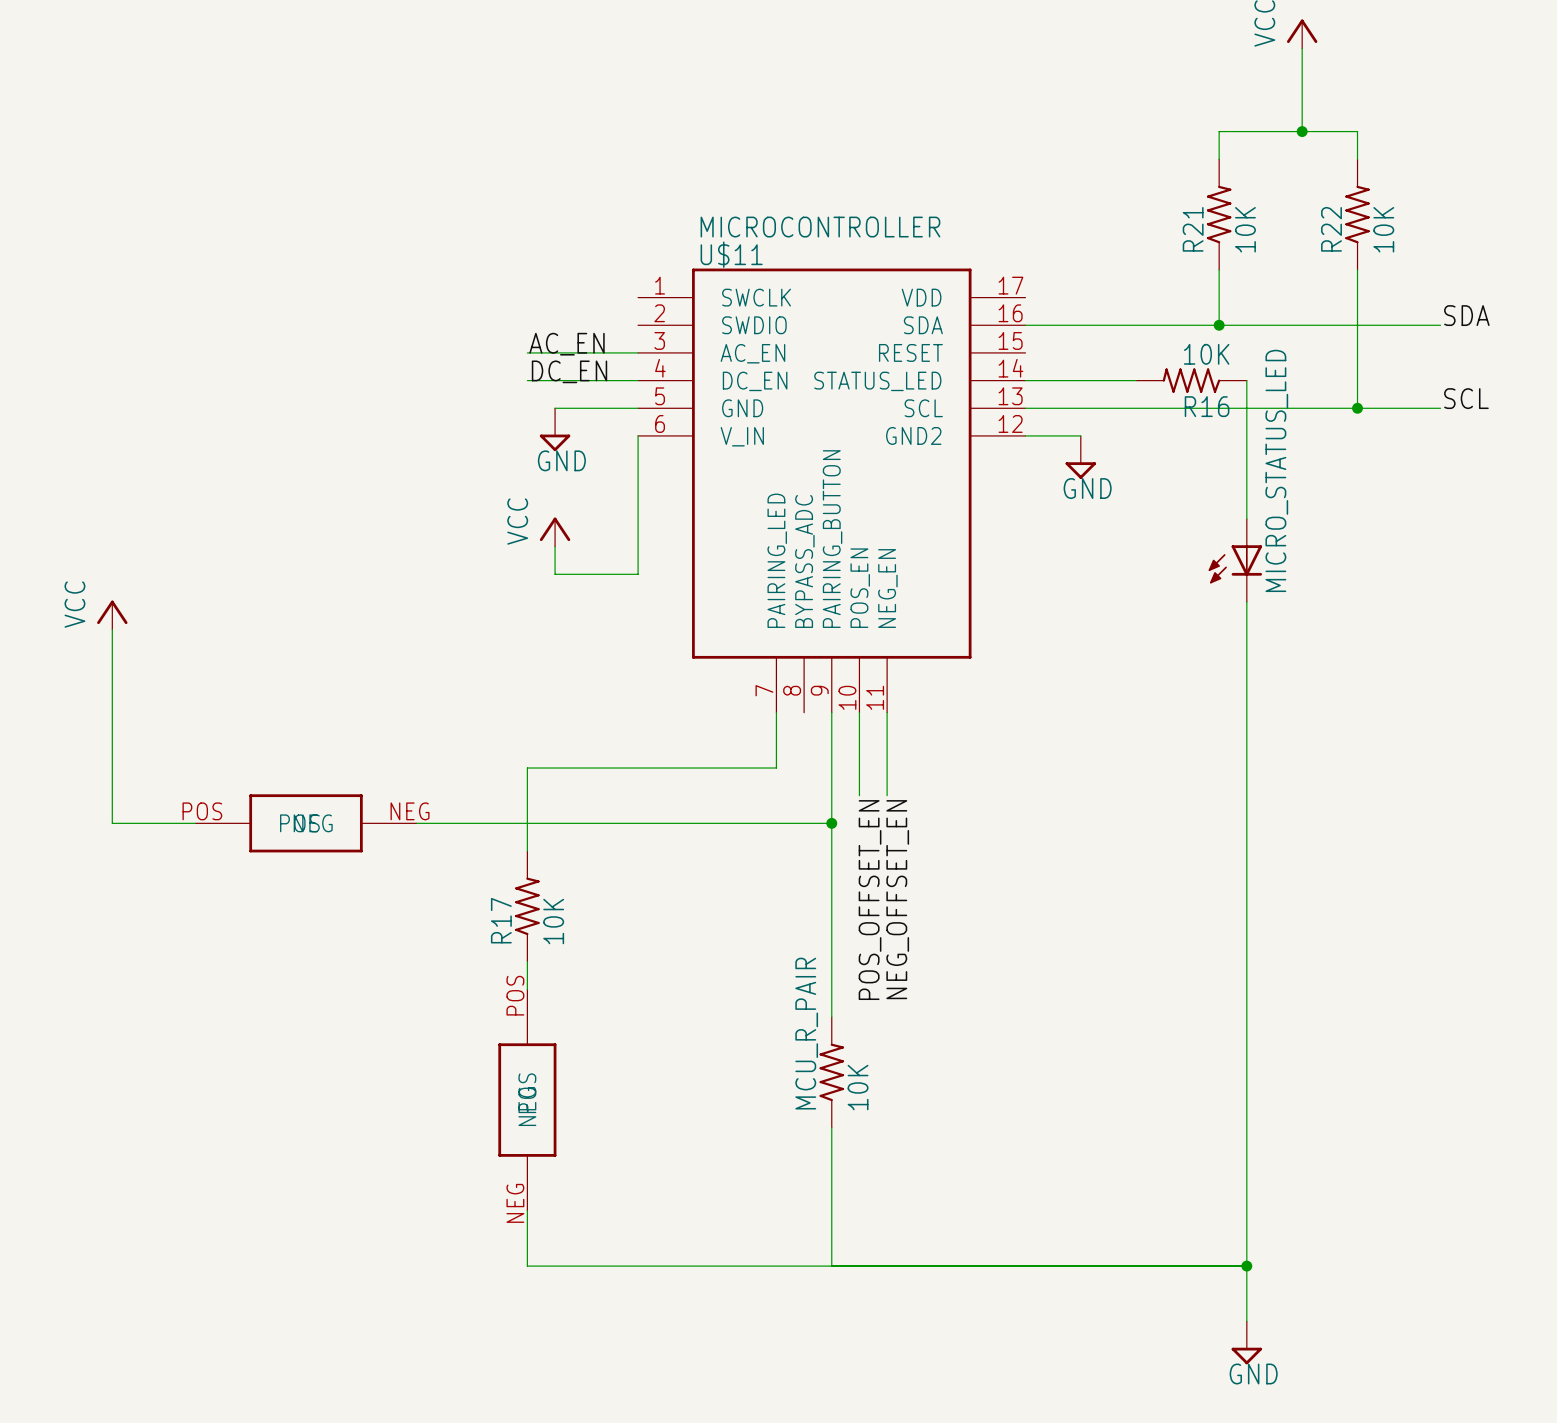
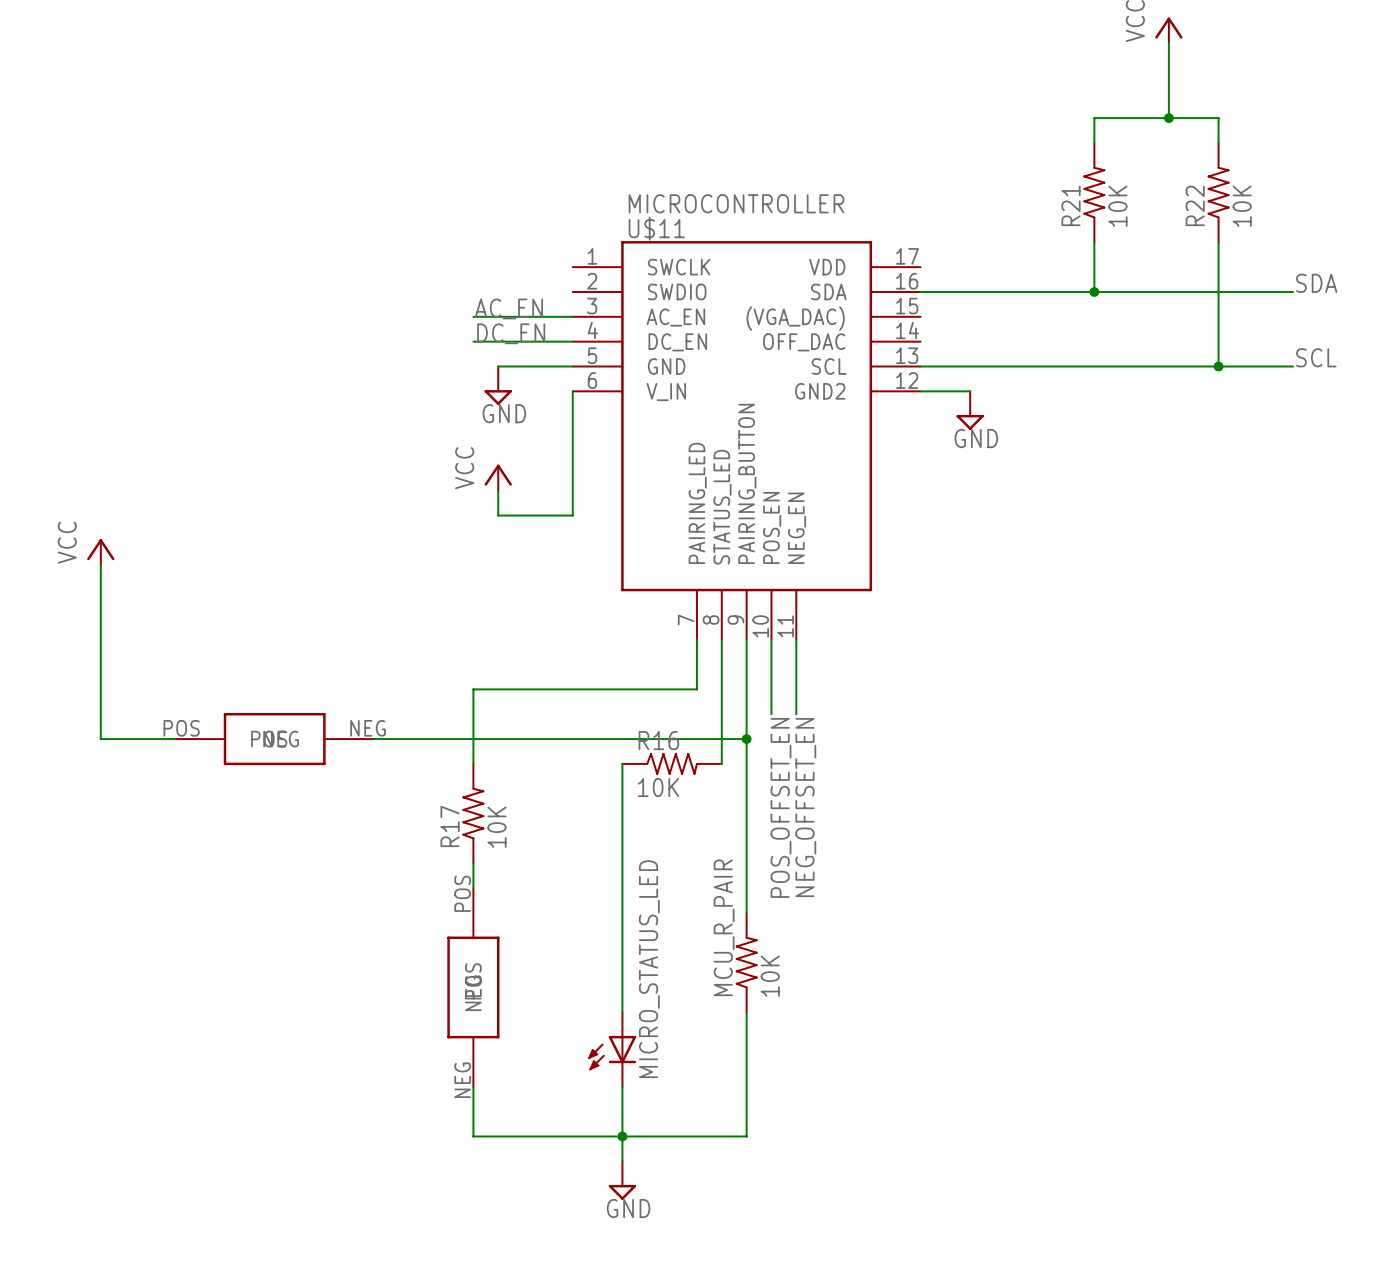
U$11 pin name: RESET (910, 352) -> (VGA_DAC) (795, 318)
wire: (1025, 380) (1136, 380) -> none
R16 rotation: 0° (1191, 380) -> 180° (672, 763)
R16 position: (1191, 380) -> (672, 763)
wire: (1246, 380) (1246, 518) -> none
U$11 pin name: STATUS_LED (877, 381) -> OFF_DAC (804, 342)
MICRO_STATUS_LED: (1235, 560) -> none
U$11 pin name: BYPASS_ADC (804, 561) -> STATUS_LED (722, 507)
wire: (1246, 601) (1246, 1321) -> none
wire: none -> (721, 639) (721, 763)
wire: none -> (622, 763) (622, 1012)
MICRO_STATUS_LED: none -> (612, 1049)
wire: none -> (622, 1086) (622, 1161)
junction: none -> (622, 1136)
wire: (831, 1266) (1246, 1266) -> none
junction: (1246, 1266) -> none
power symbol: none -> GND (622, 1180)
power symbol: GND (1246, 1342) -> none

